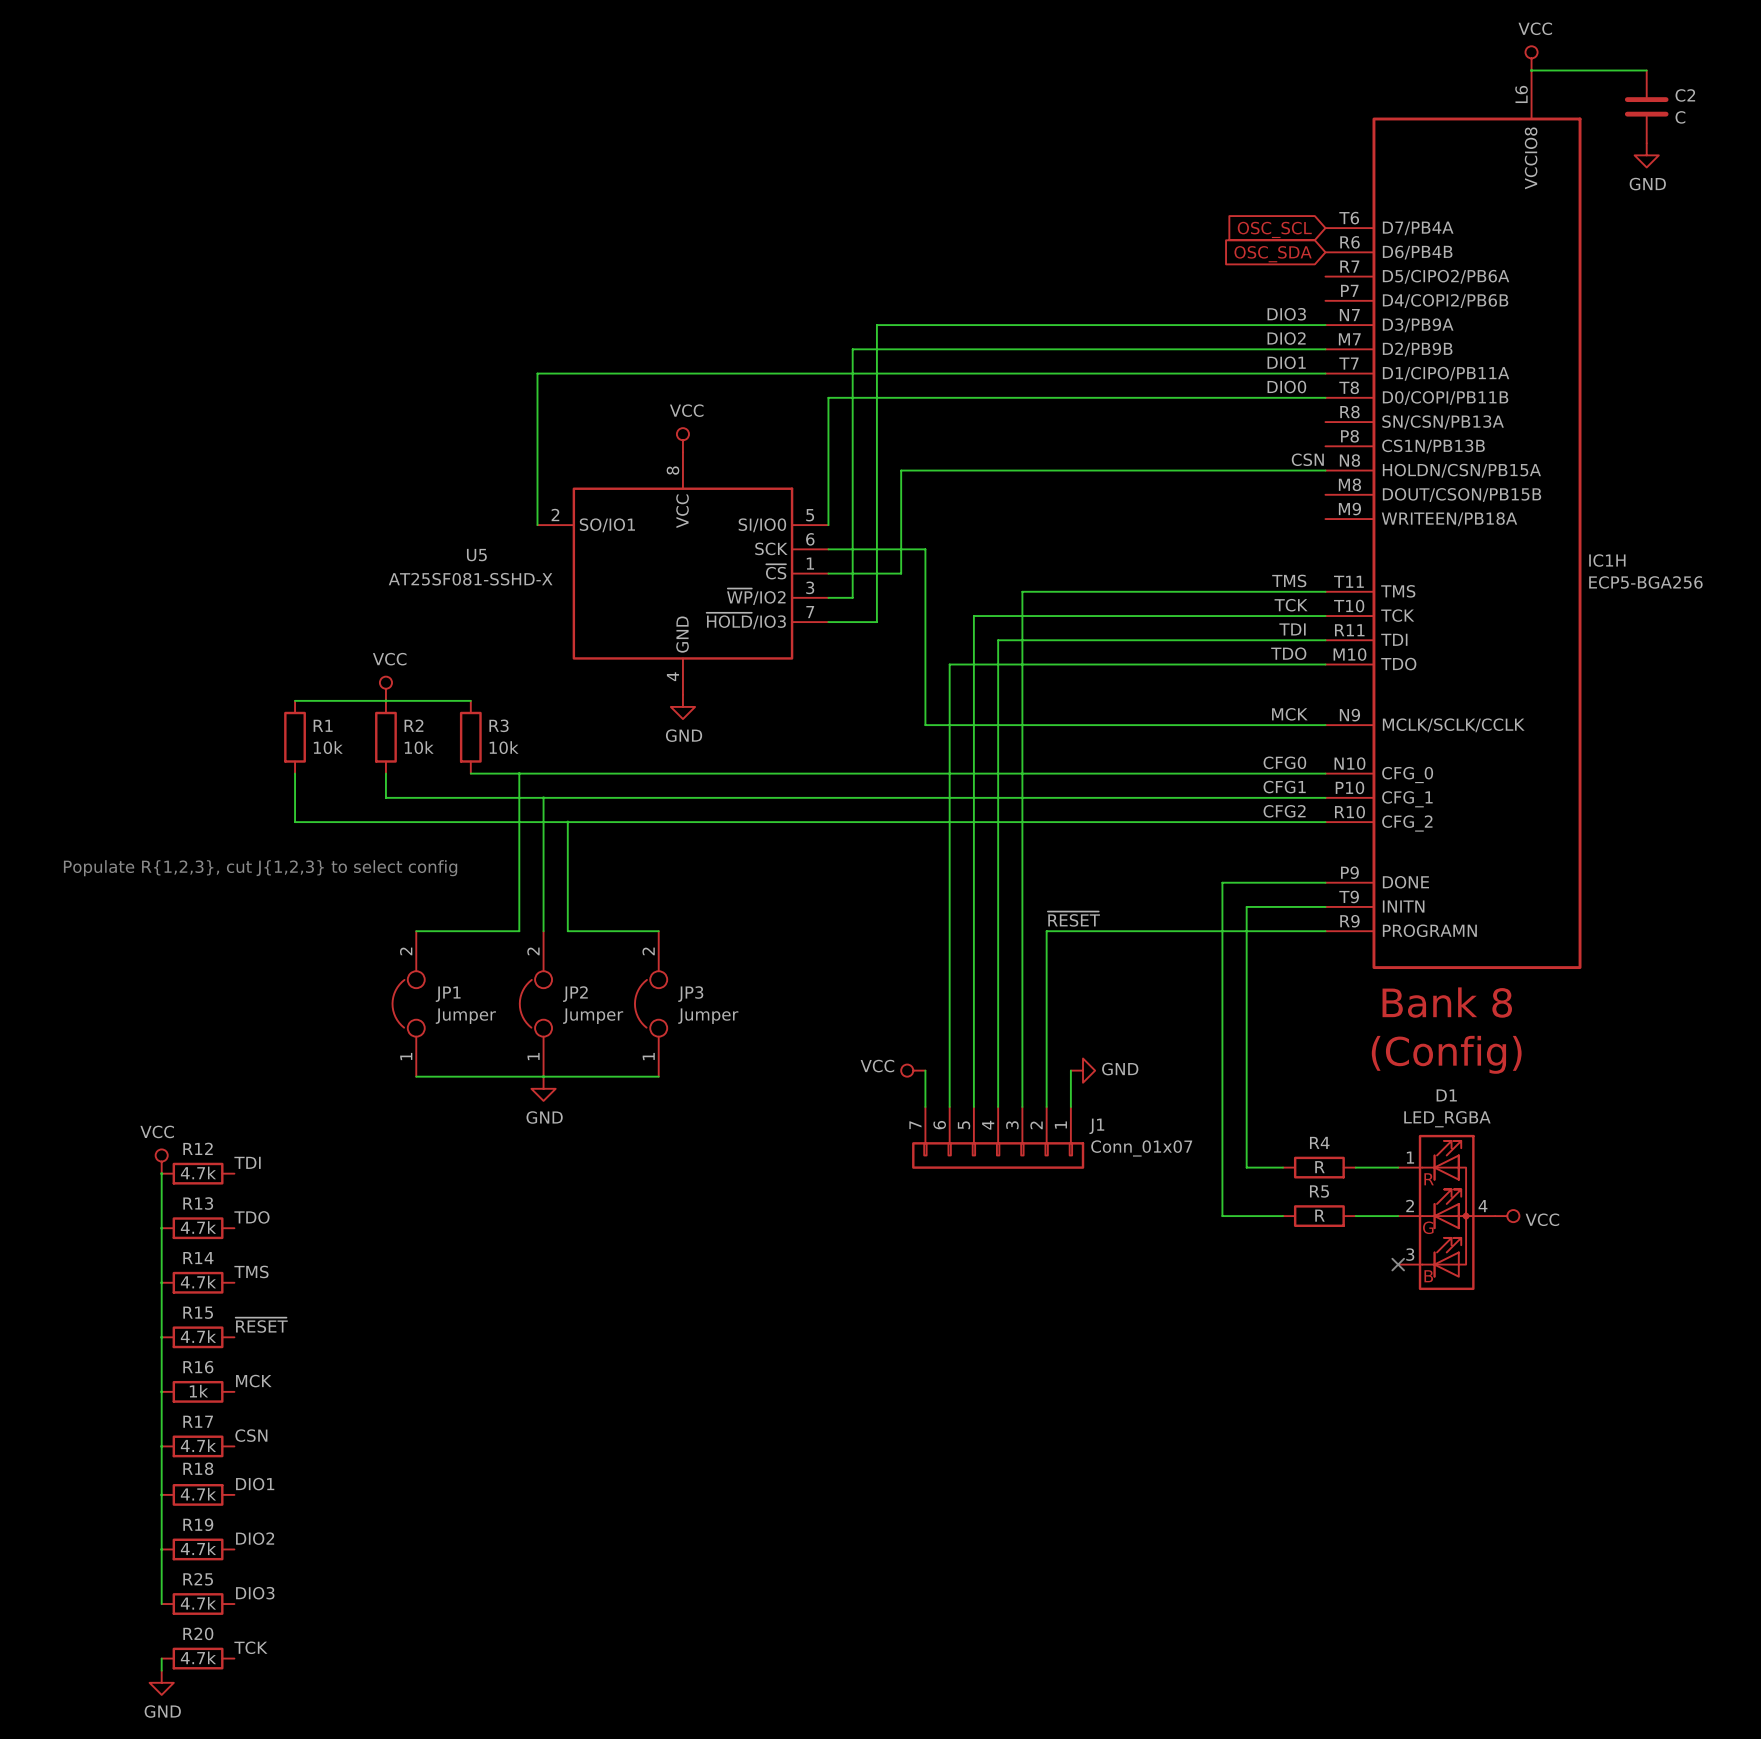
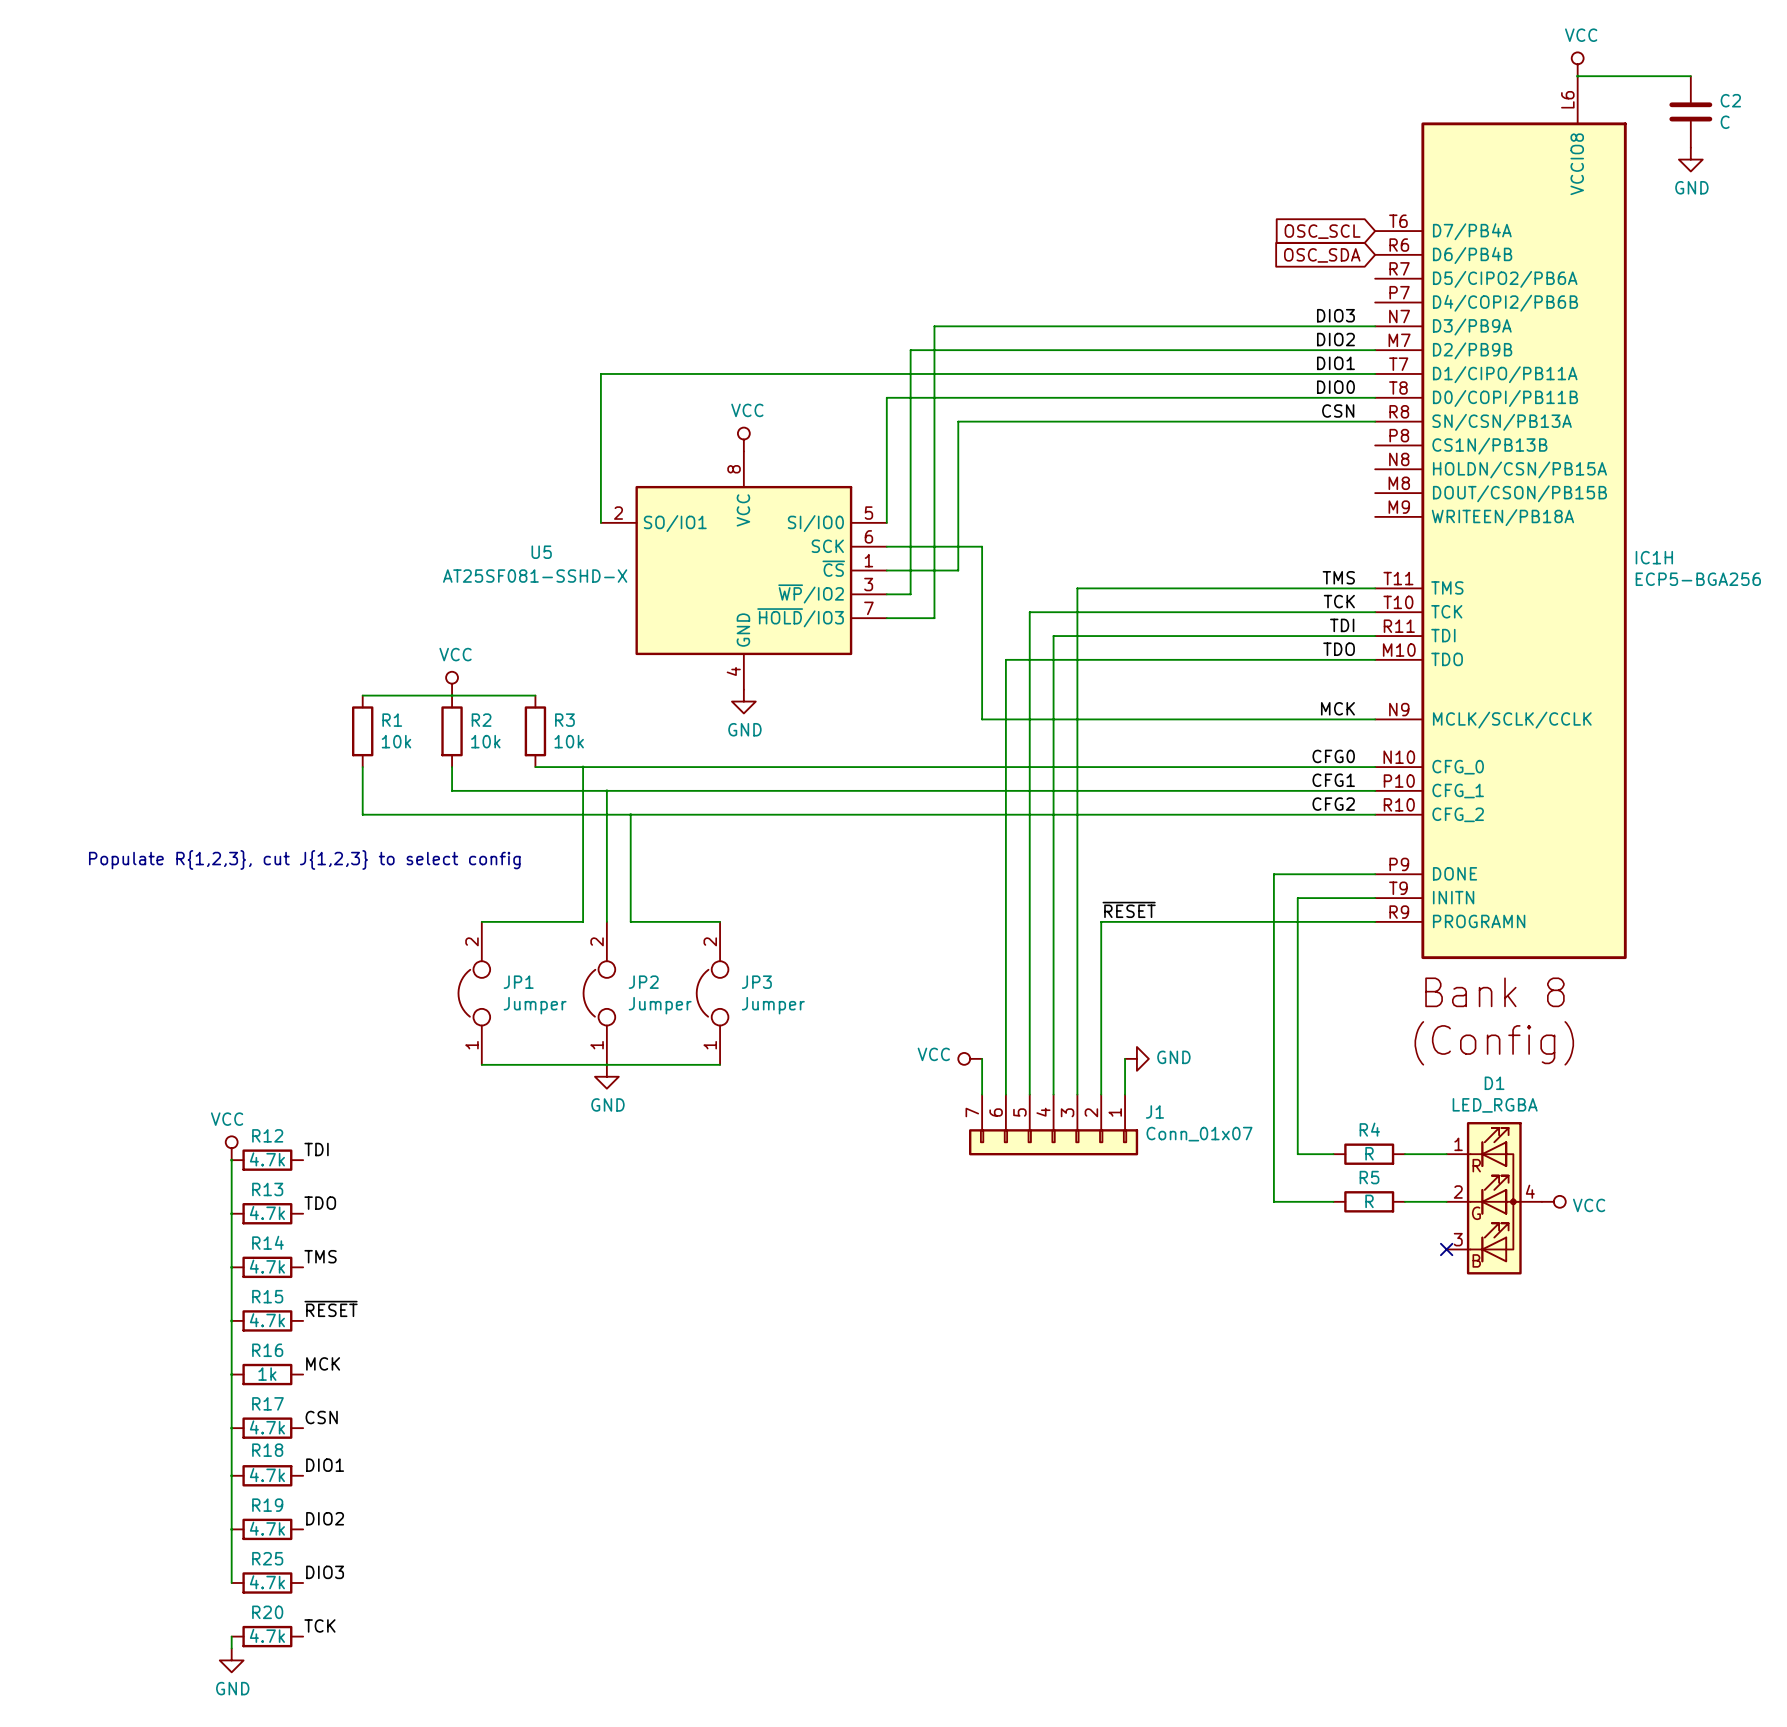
label position: CSN (1307, 459) -> CSN (1338, 411)
wire: (901, 470) (1325, 470) -> (958, 469) (958, 421) (1375, 421)

